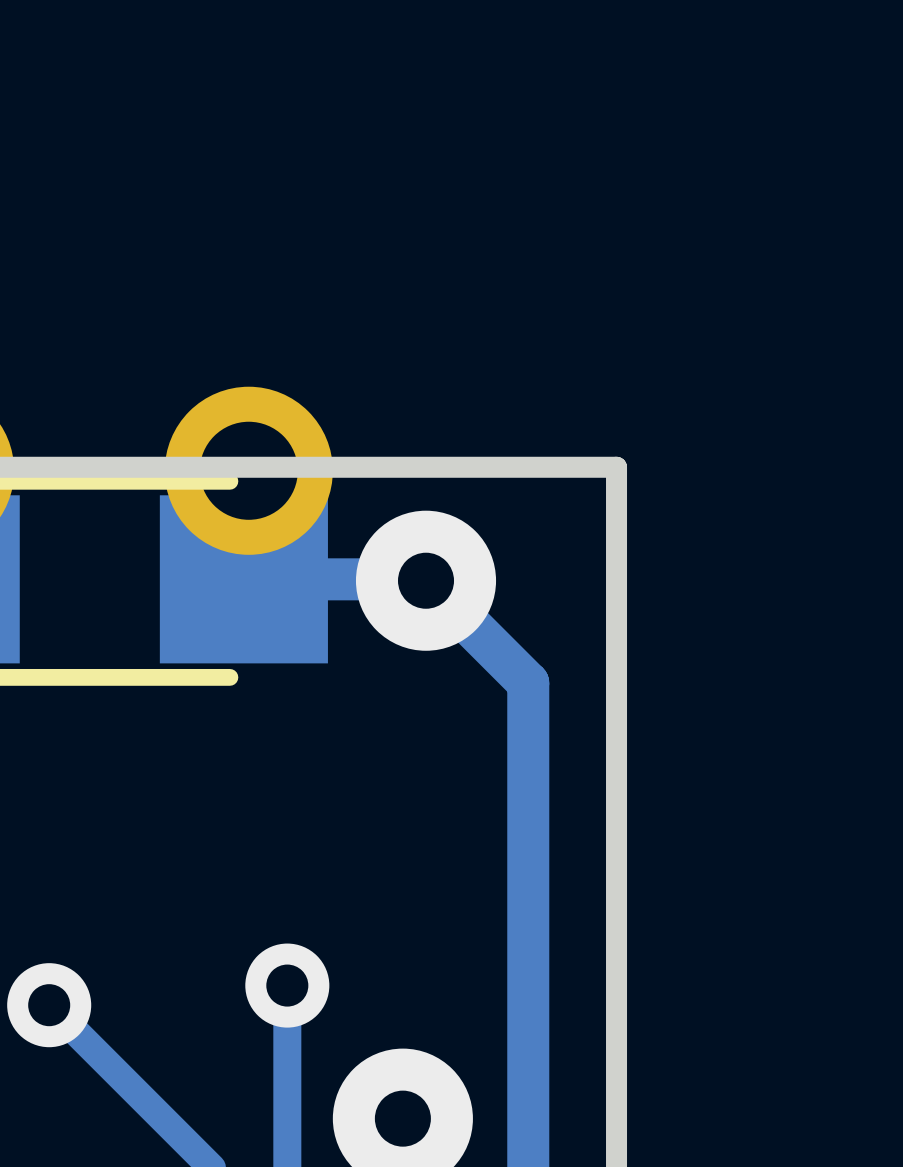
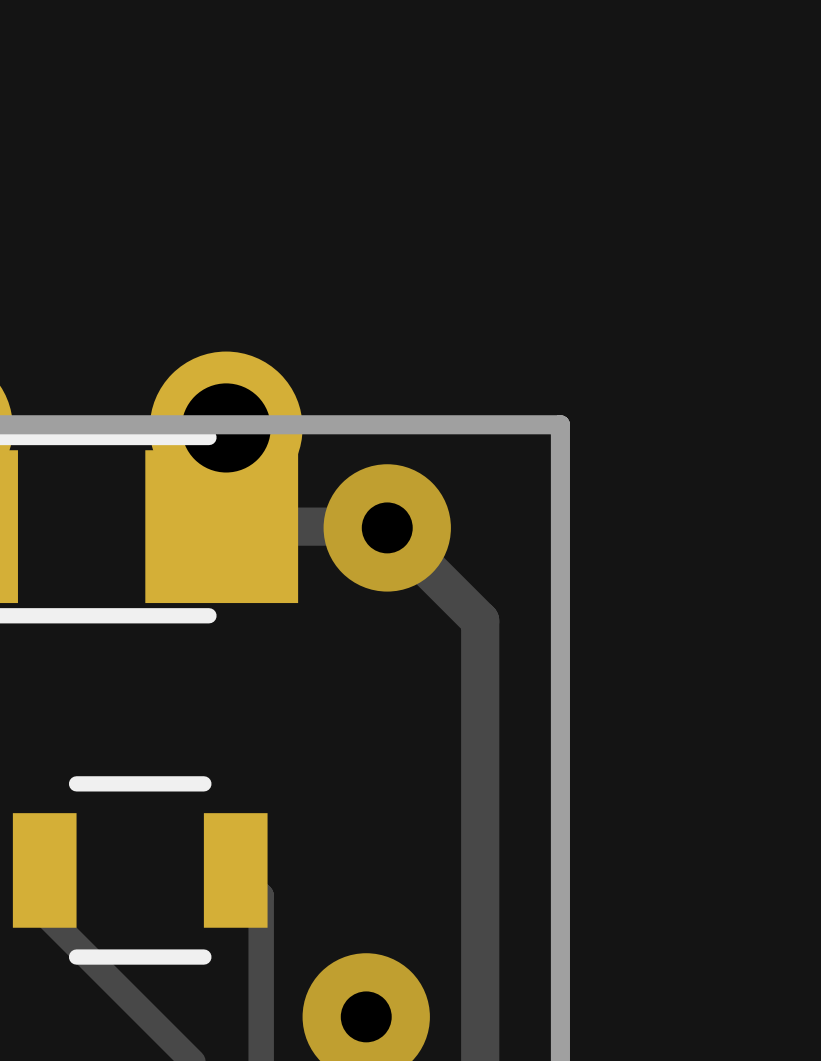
part: none -> (140, 870)
via: (287, 985) -> none
via: (49, 1005) -> none

